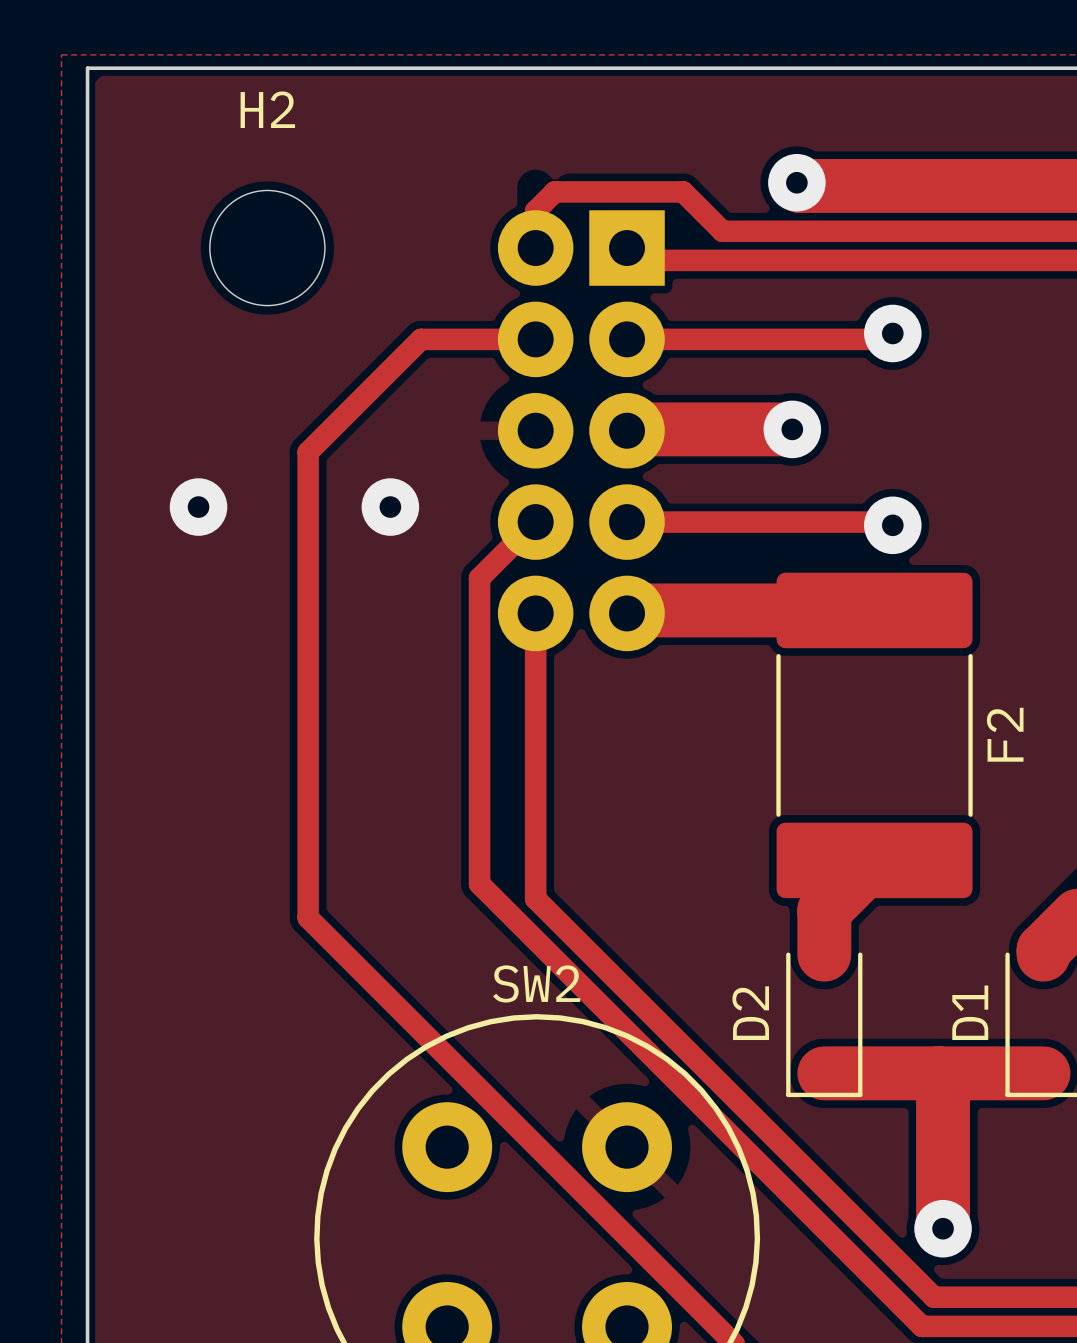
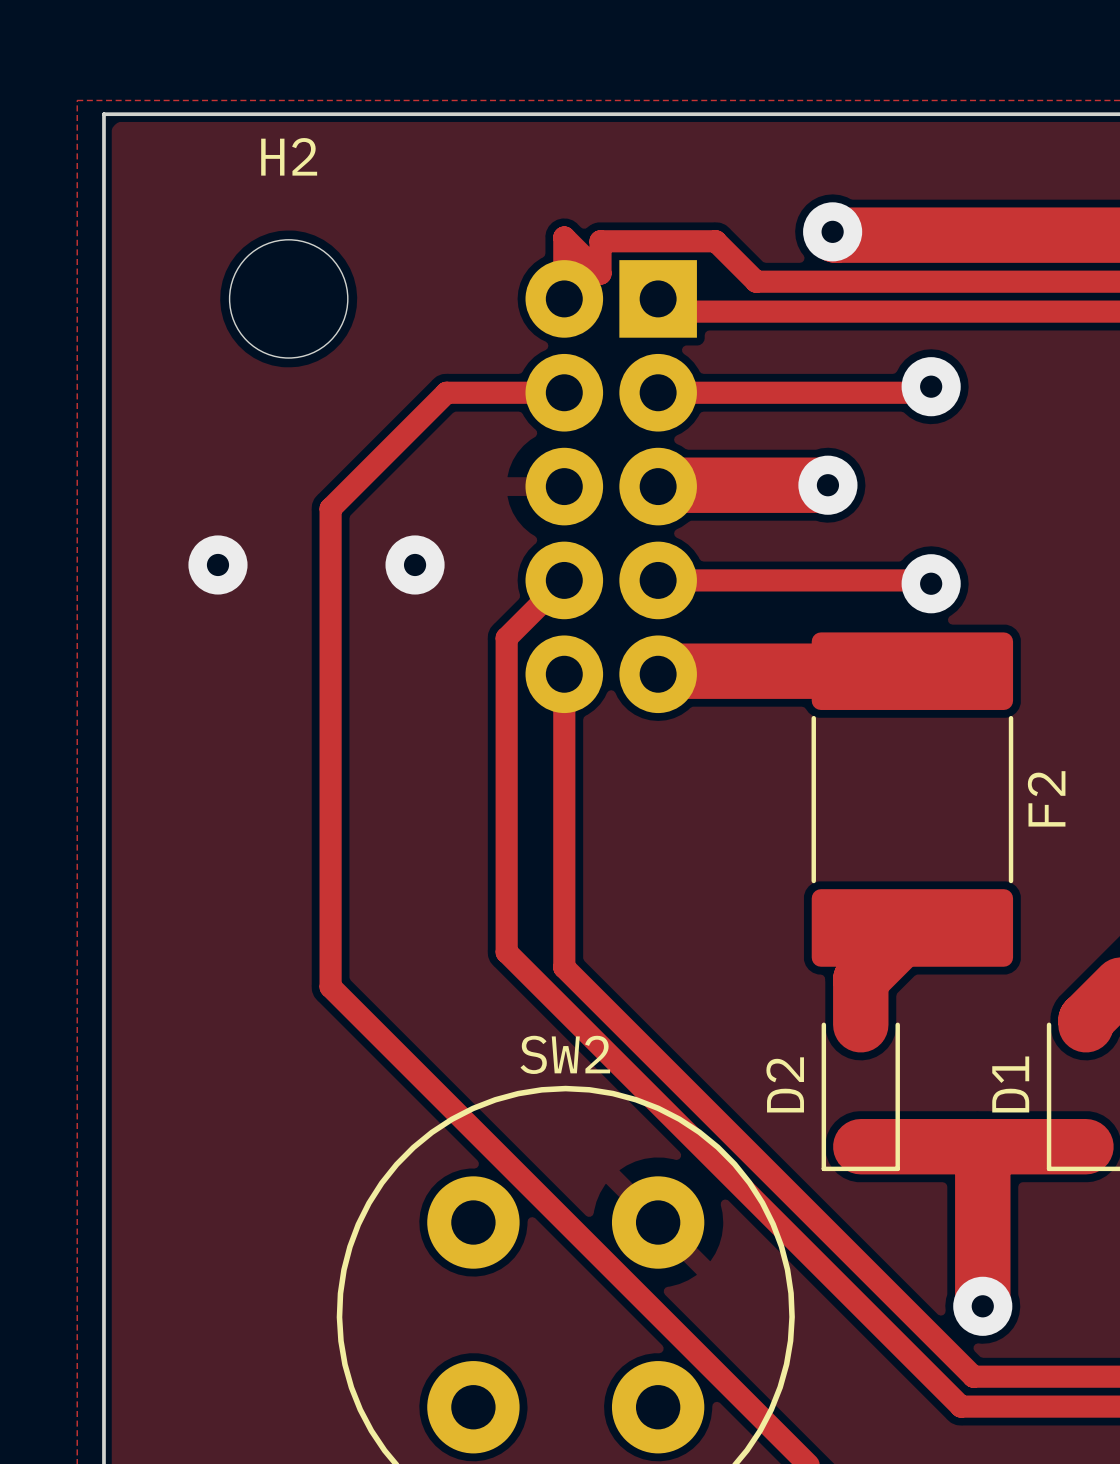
track: (570, 191) (554, 191) (535, 211) -> (600, 241) (600, 273) (564, 237) (564, 260)

